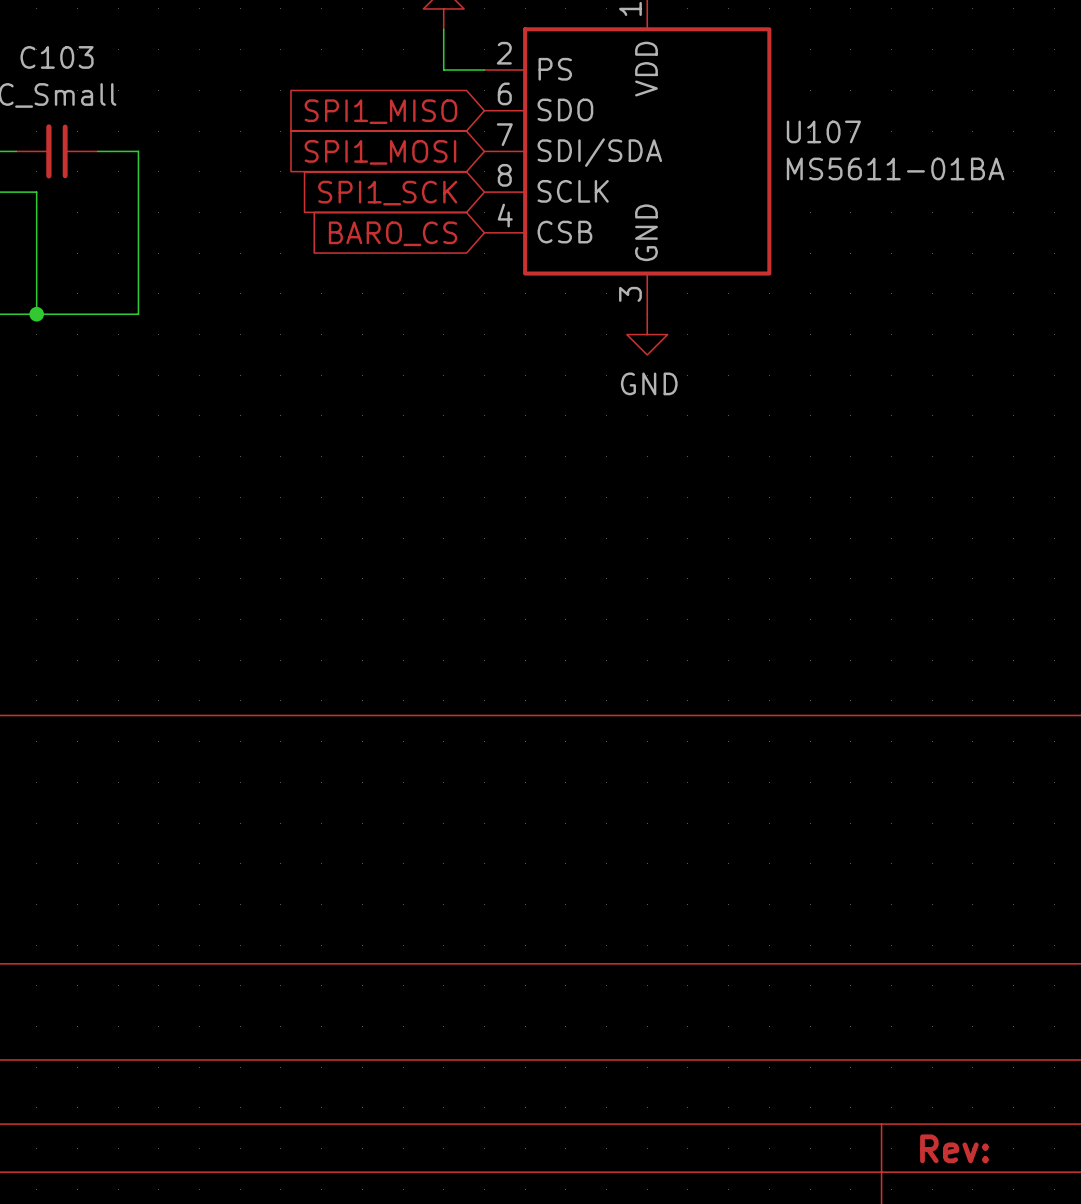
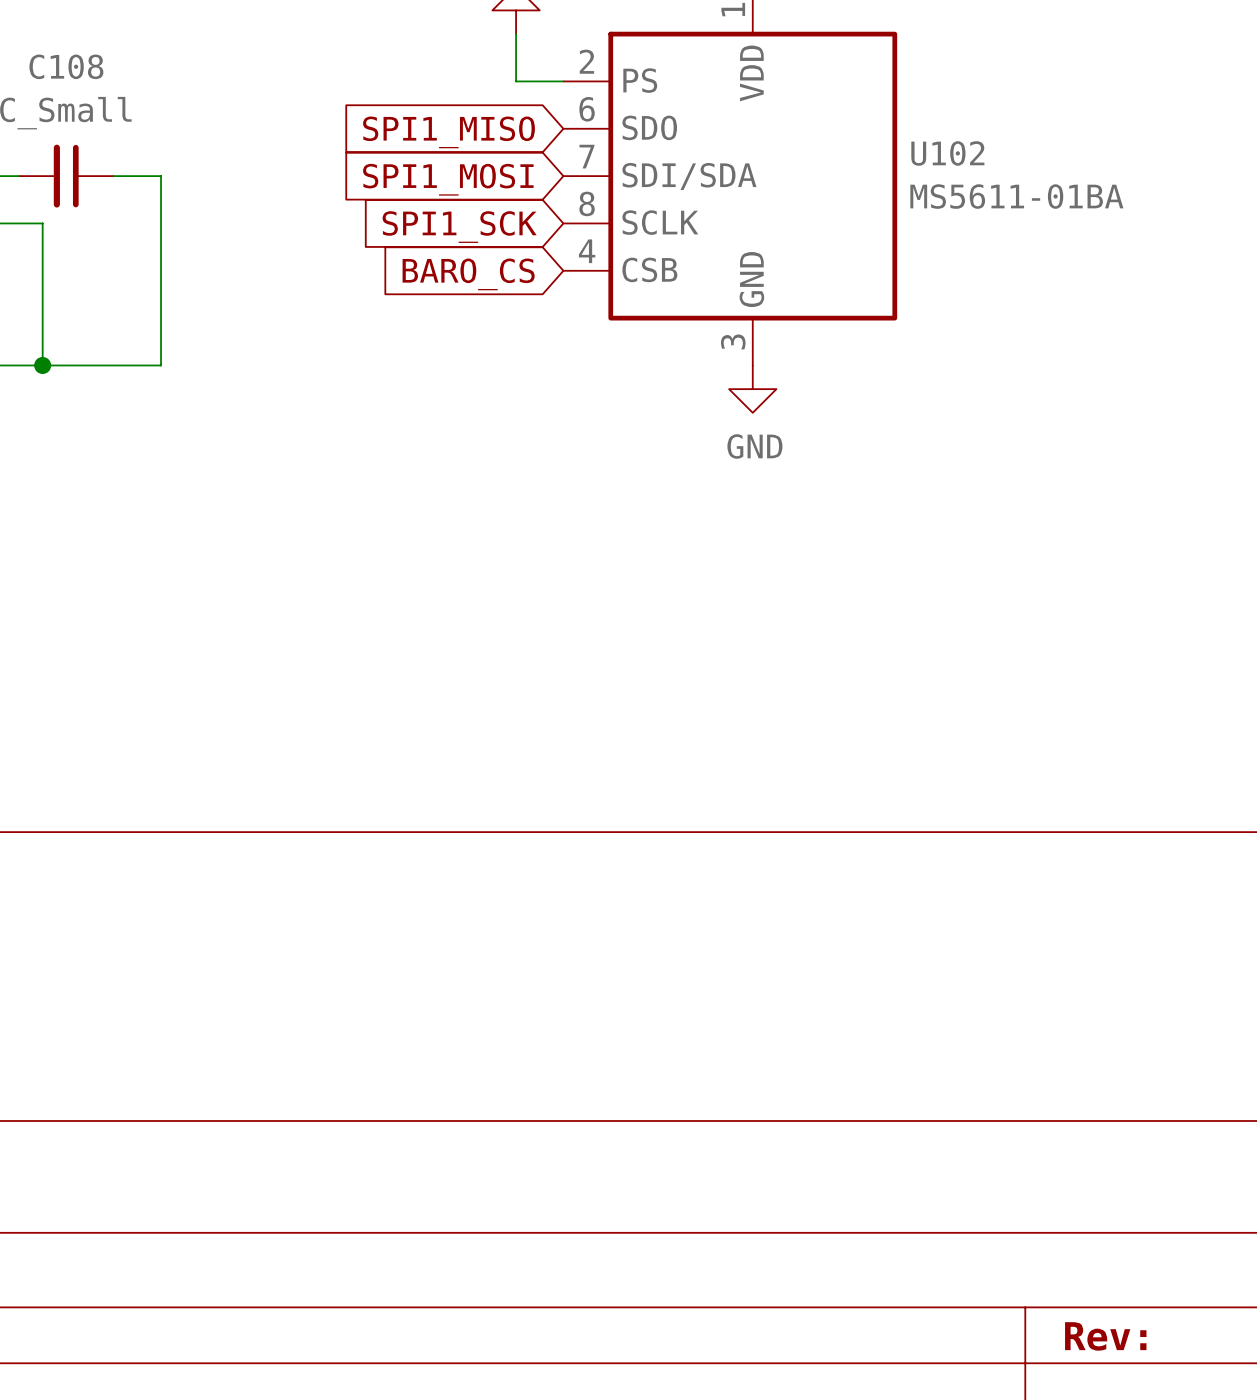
C103 name: C103 (57, 57) -> C108 (66, 66)
U107 name: U107 (823, 131) -> U102 (947, 153)

